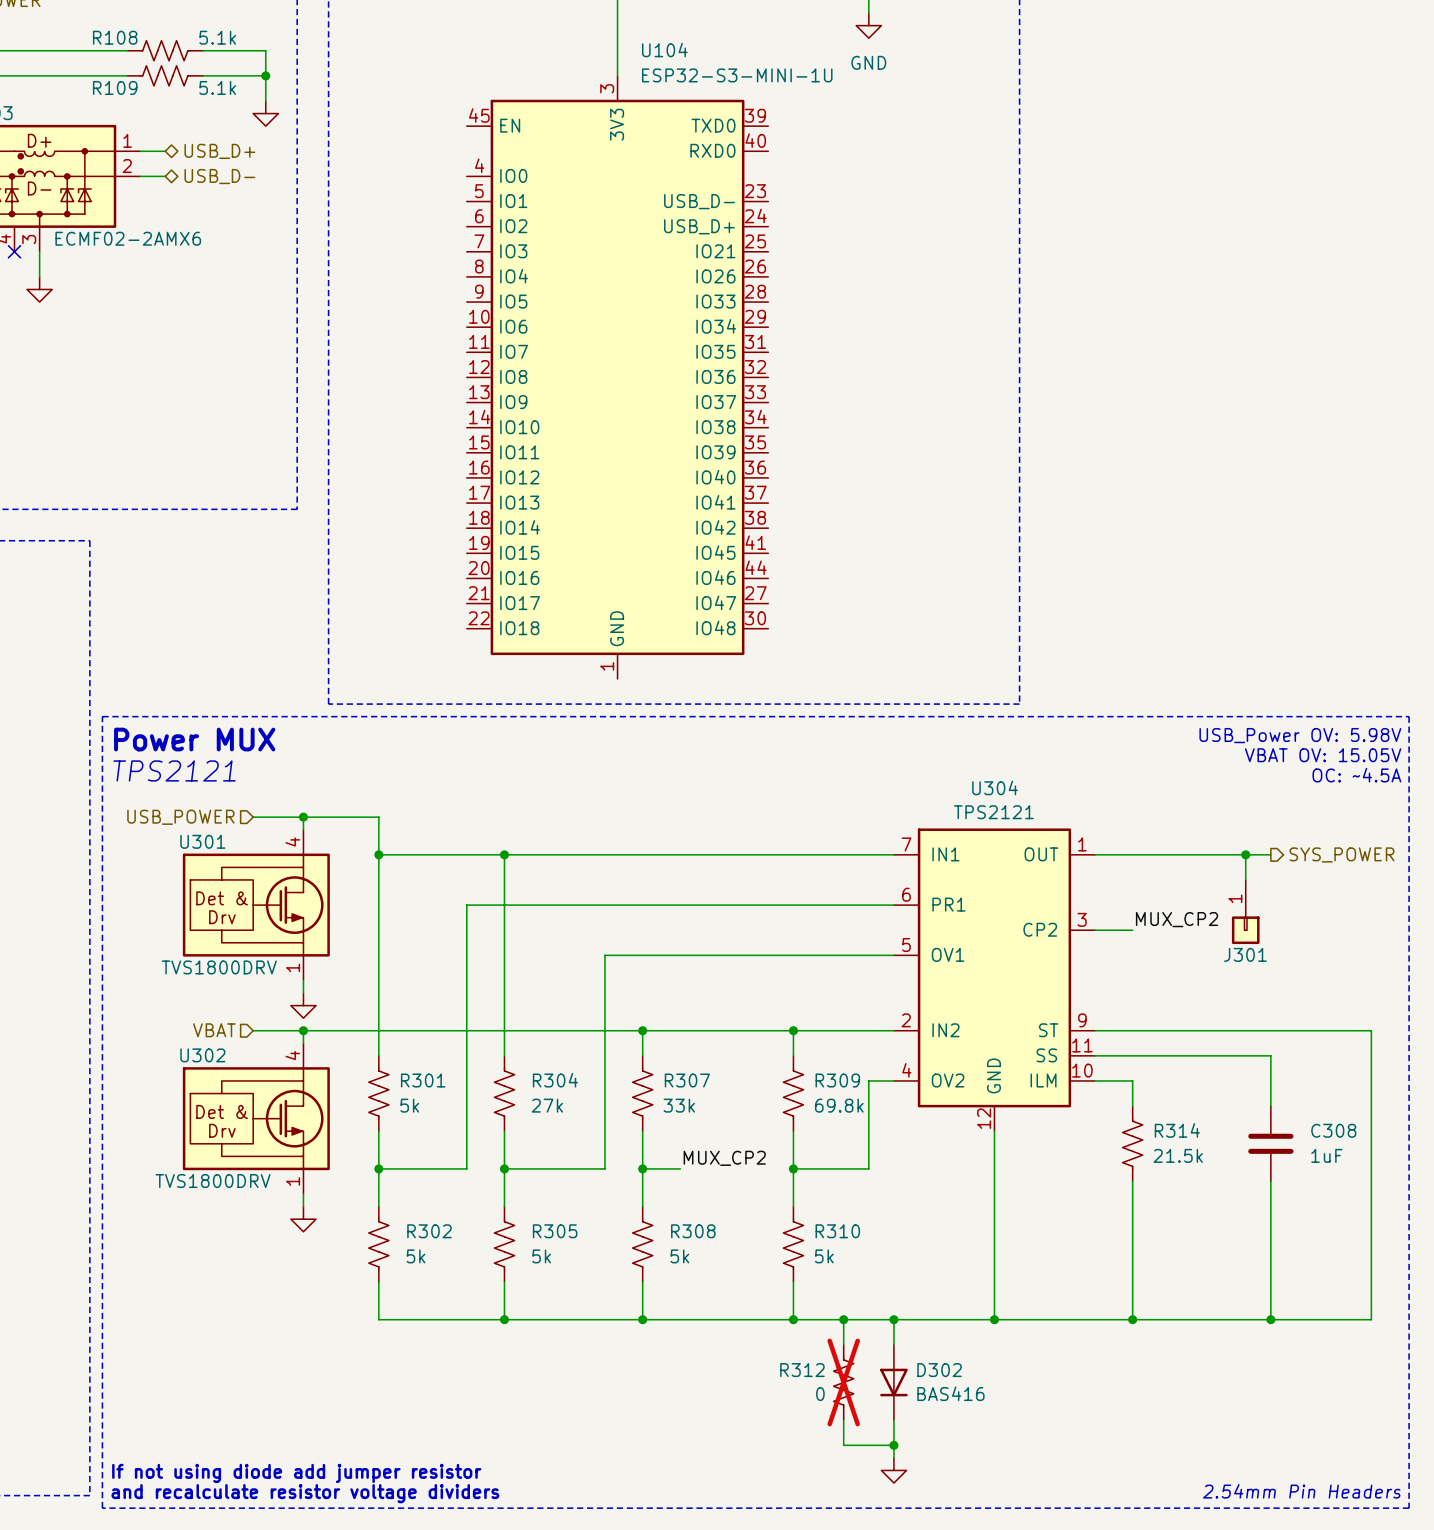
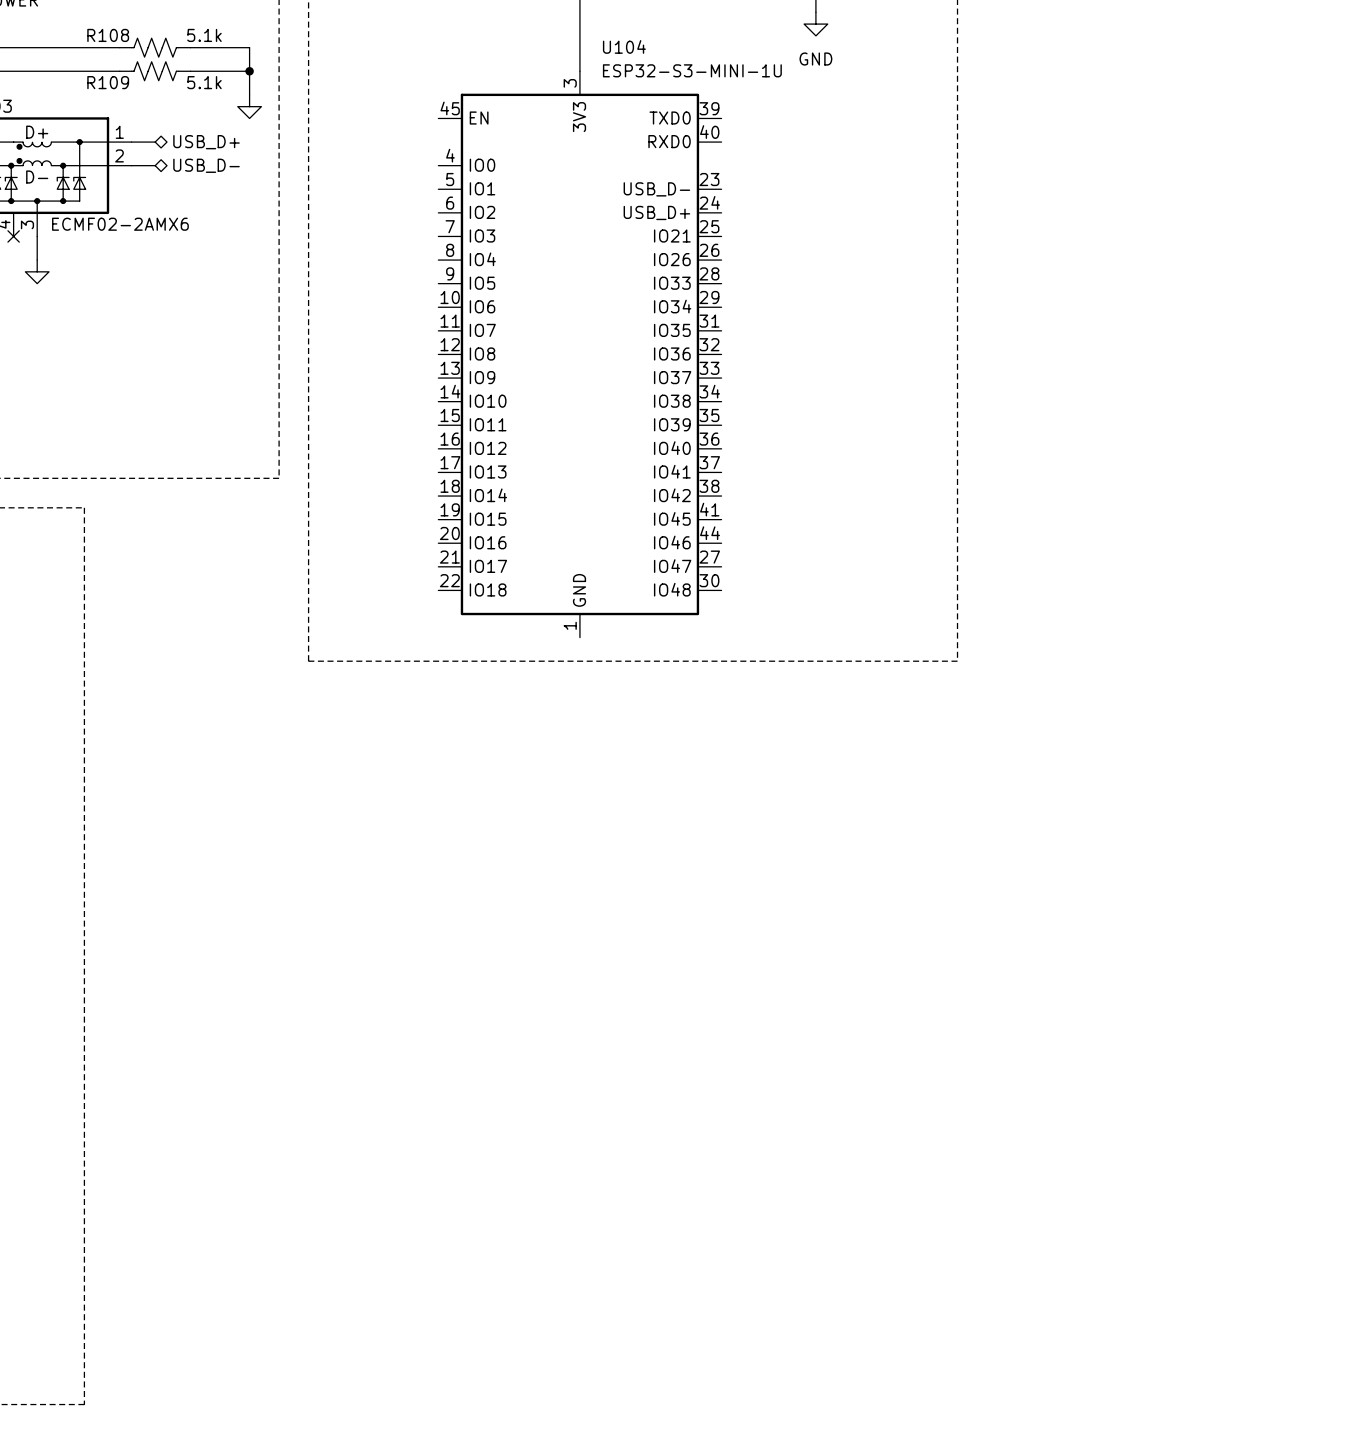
line: (102, 716) (1409, 716) (1409, 1508) (102, 1508) (102, 716) -> none
text: USB_Power OV: 5.98V (1300, 735) -> none
text: Power MUX (194, 739) -> none
text: VBAT OV: 15.05V (1323, 755) -> none
text: TPS2121 (174, 770) -> none
text: OC: ~4.5A (1356, 775) -> none
hierarchical label: USB_POWER (180, 817) -> none
wire: (253, 817) (378, 817) (378, 1055) -> none
wire: (303, 817) (303, 829) -> none
junction: (303, 817) -> none
wire: (378, 854) (893, 854) -> none
junction: (378, 854) -> none
wire: (504, 854) (504, 1055) -> none
junction: (504, 854) -> none
wire: (1094, 854) (1270, 854) -> none
wire: (1245, 854) (1245, 879) -> none
junction: (1245, 854) -> none
hierarchical label: SYS_POWER (1341, 854) -> none
U301: TVS1800DRV (256, 905) -> none
wire: (893, 905) (466, 905) (466, 1168) (378, 1168) -> none
J301: (1245, 912) -> none
label: MUX_CP2 (1177, 919) -> none
wire: (1094, 930) (1132, 930) -> none
wire: (893, 955) (604, 955) (604, 1168) (504, 1168) -> none
U304: TPS2121 (994, 979) -> none
wire: (303, 980) (303, 993) -> none
power symbol: (303, 1005) -> none
hierarchical label: VBAT (214, 1030) -> none
wire: (253, 1030) (893, 1030) -> none
wire: (303, 1030) (303, 1043) -> none
junction: (303, 1030) -> none
wire: (642, 1030) (642, 1055) -> none
junction: (642, 1030) -> none
wire: (793, 1030) (793, 1055) -> none
junction: (793, 1030) -> none
wire: (1094, 1030) (1371, 1030) (1371, 1319) (378, 1319) (378, 1282) -> none
wire: (1094, 1055) (1270, 1055) (1270, 1106) -> none
wire: (893, 1080) (868, 1080) (868, 1168) (793, 1168) -> none
wire: (1094, 1080) (1132, 1080) (1132, 1106) -> none
R301: 5k (378, 1093) -> none
R304: 27k (504, 1093) -> none
R307: 33k (642, 1093) -> none
R309: 69.8k (793, 1093) -> none
U302: TVS1800DRV (256, 1118) -> none
wire: (378, 1131) (378, 1206) -> none
wire: (504, 1131) (504, 1206) -> none
wire: (642, 1131) (642, 1206) -> none
wire: (793, 1131) (793, 1206) -> none
wire: (994, 1131) (994, 1319) -> none
R314: 21.5k (1132, 1143) -> none
C308: 1uF (1270, 1143) -> none
label: MUX_CP2 (724, 1158) -> none
junction: (378, 1168) -> none
junction: (504, 1168) -> none
wire: (642, 1168) (680, 1168) -> none
junction: (642, 1168) -> none
junction: (793, 1168) -> none
wire: (1132, 1181) (1132, 1319) -> none
wire: (1270, 1181) (1270, 1319) -> none
wire: (303, 1194) (303, 1206) -> none
power symbol: (303, 1219) -> none
R302: 5k (378, 1244) -> none
R305: 5k (504, 1244) -> none
R308: 5k (642, 1244) -> none
R310: 5k (793, 1244) -> none
wire: (504, 1282) (504, 1319) -> none
wire: (642, 1282) (642, 1319) -> none
wire: (793, 1282) (793, 1319) -> none
junction: (504, 1319) -> none
junction: (642, 1319) -> none
junction: (793, 1319) -> none
wire: (843, 1319) (843, 1344) -> none
junction: (843, 1319) -> none
wire: (893, 1319) (893, 1344) -> none
junction: (893, 1319) -> none
junction: (994, 1319) -> none
junction: (1132, 1319) -> none
junction: (1270, 1319) -> none
R312: 0 (843, 1382) -> none
D302: BAS416 (893, 1382) -> none
wire: (843, 1420) (843, 1445) (893, 1445) -> none
wire: (893, 1420) (893, 1457) -> none
junction: (893, 1445) -> none
power symbol: (893, 1470) -> none
text: If not using diode add jumper resistor (296, 1473) -> none
text: 2.54mm Pin Headers (1301, 1491) -> none
text: and recalculate resistor voltage dividers (305, 1493) -> none

